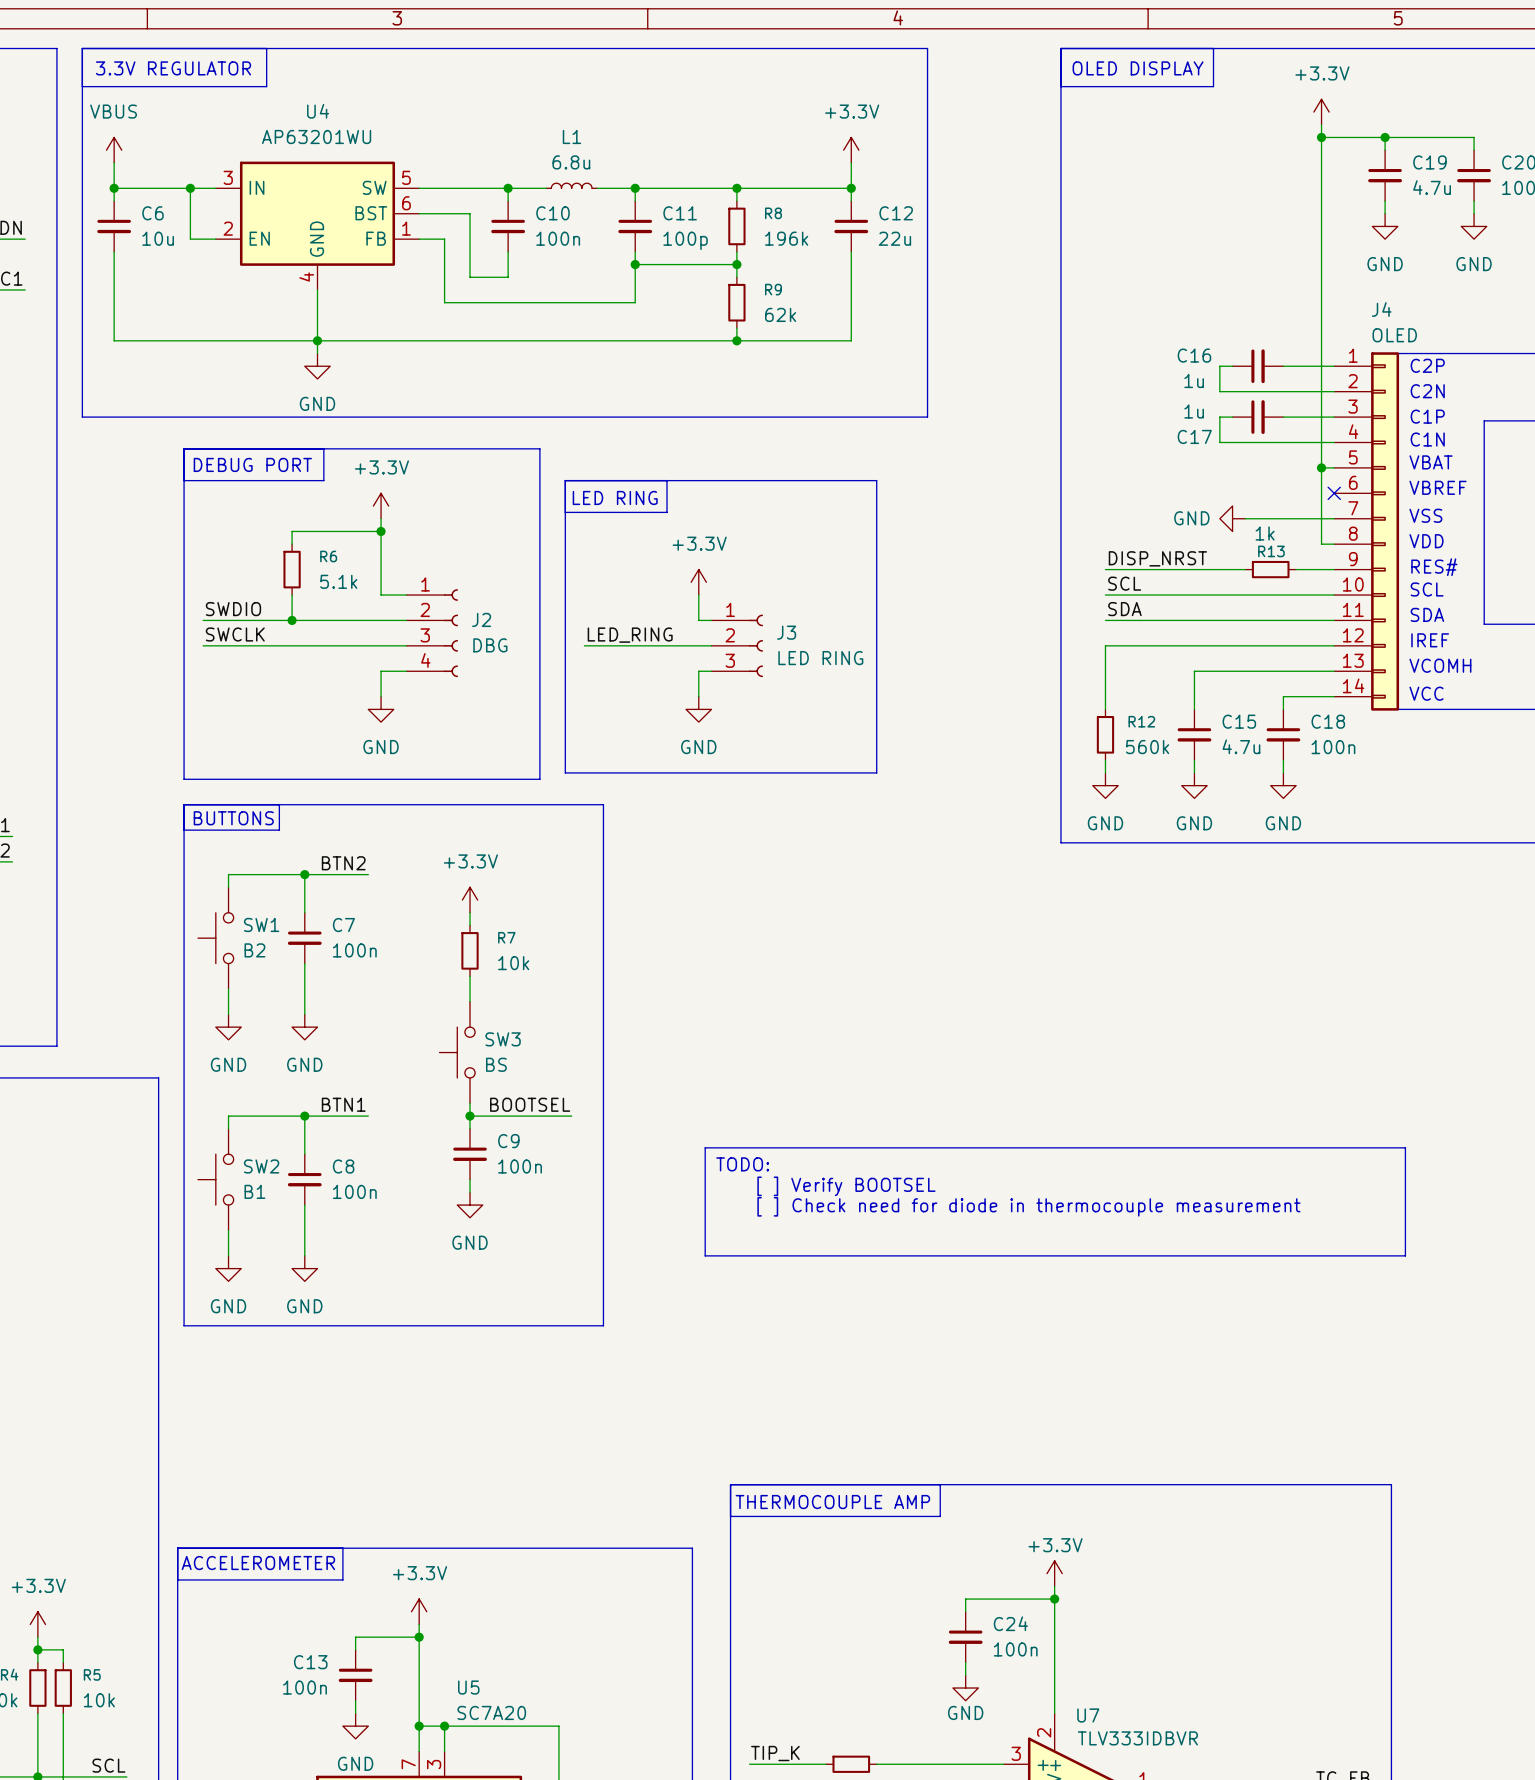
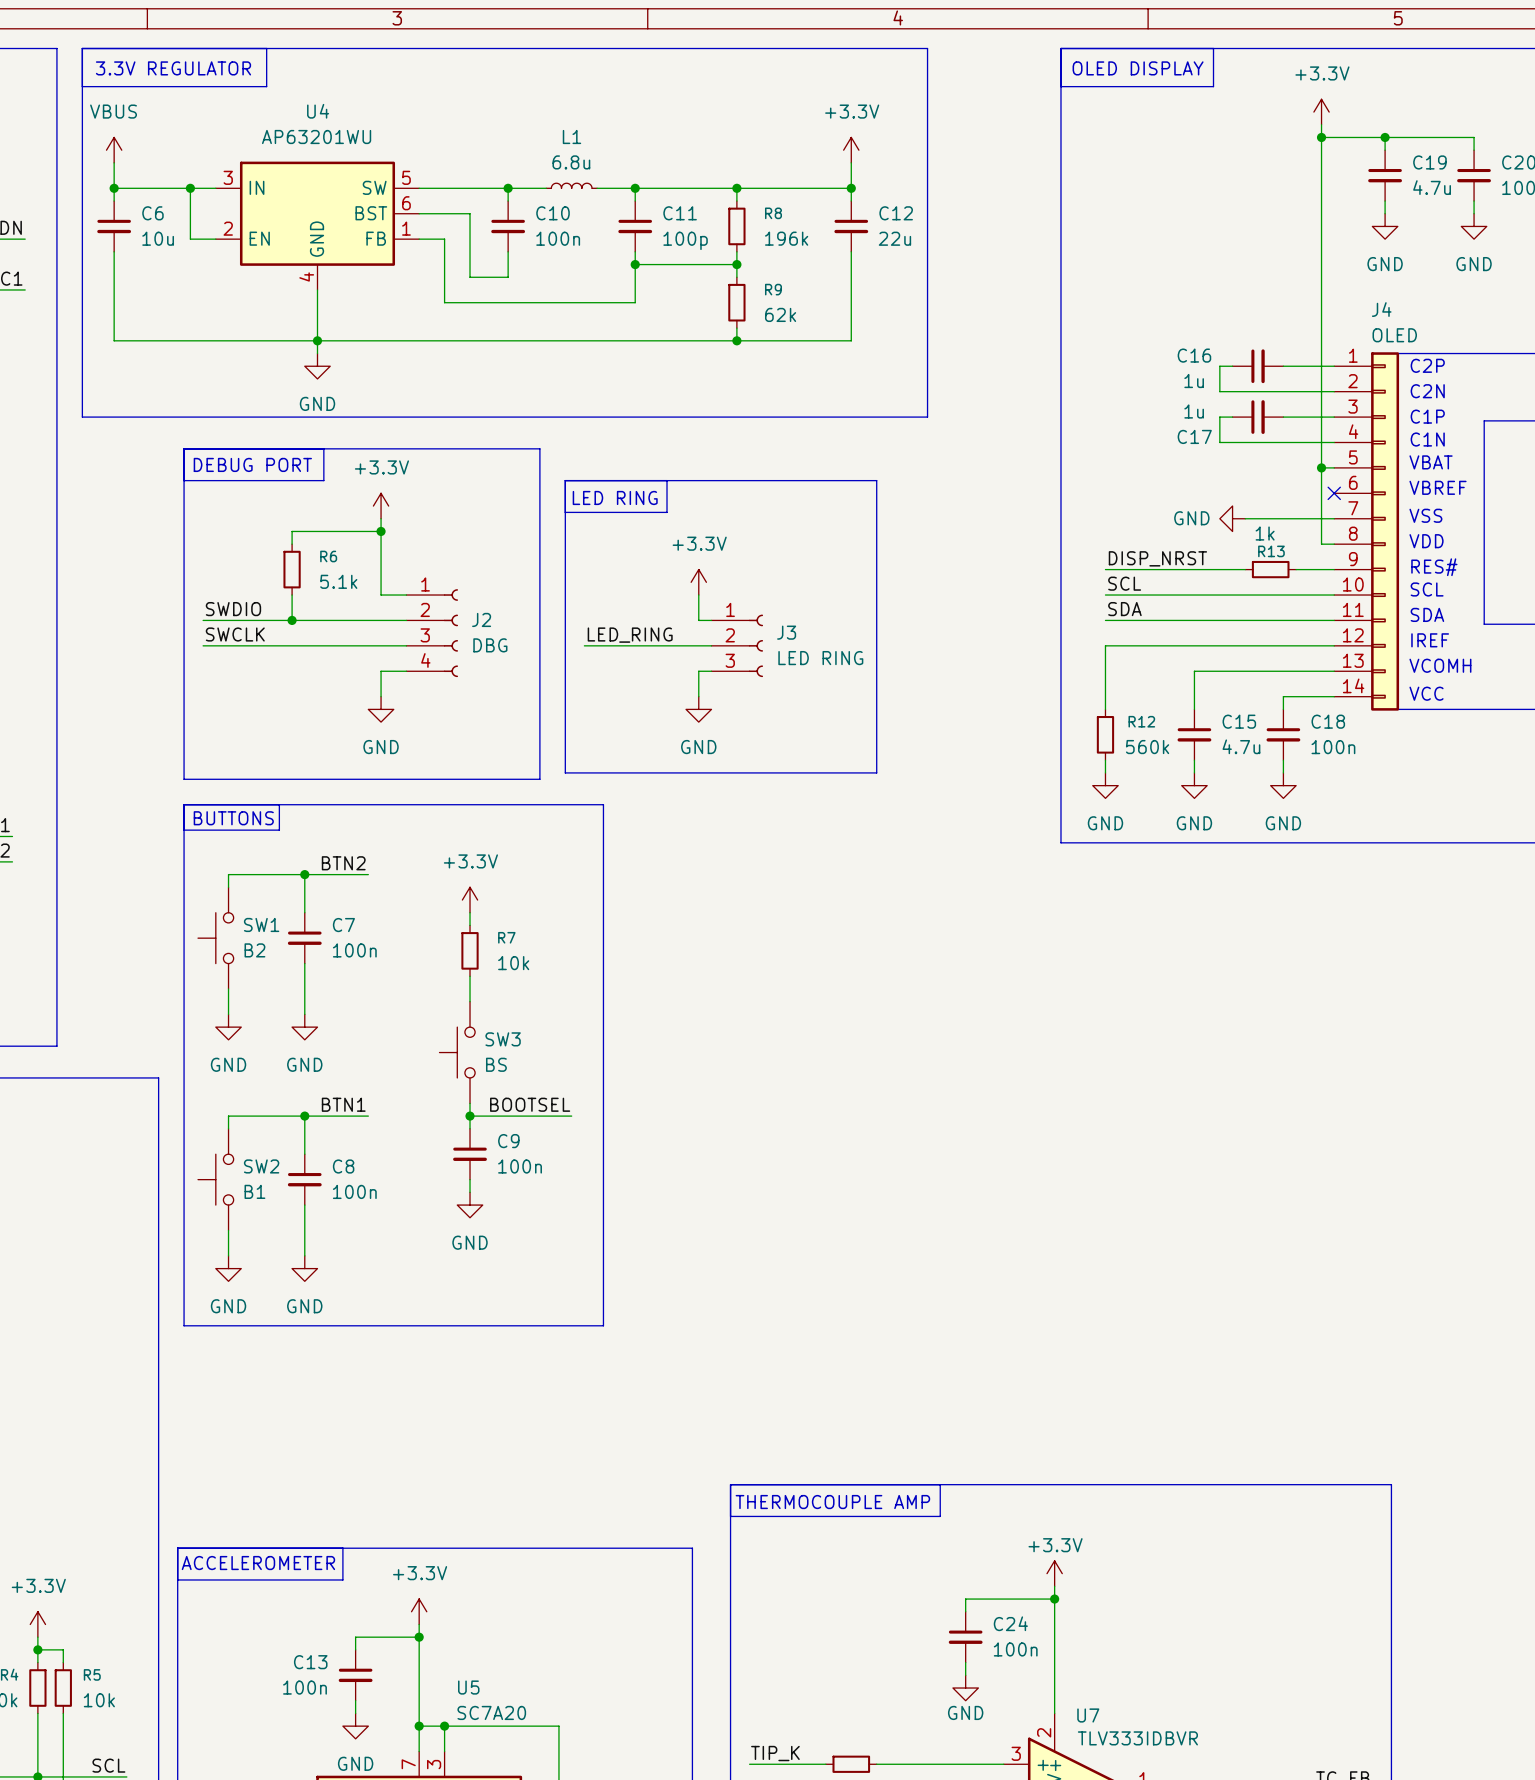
line: (705, 1147) (1405, 1147) (1405, 1255) (705, 1255) (705, 1147) -> none
text: TODO: (742, 1164) -> none
text: [ ] Verify BOOTSEL (846, 1186) -> none
text: [ ] Check need for diode in thermocouple measurement (1028, 1206) -> none

